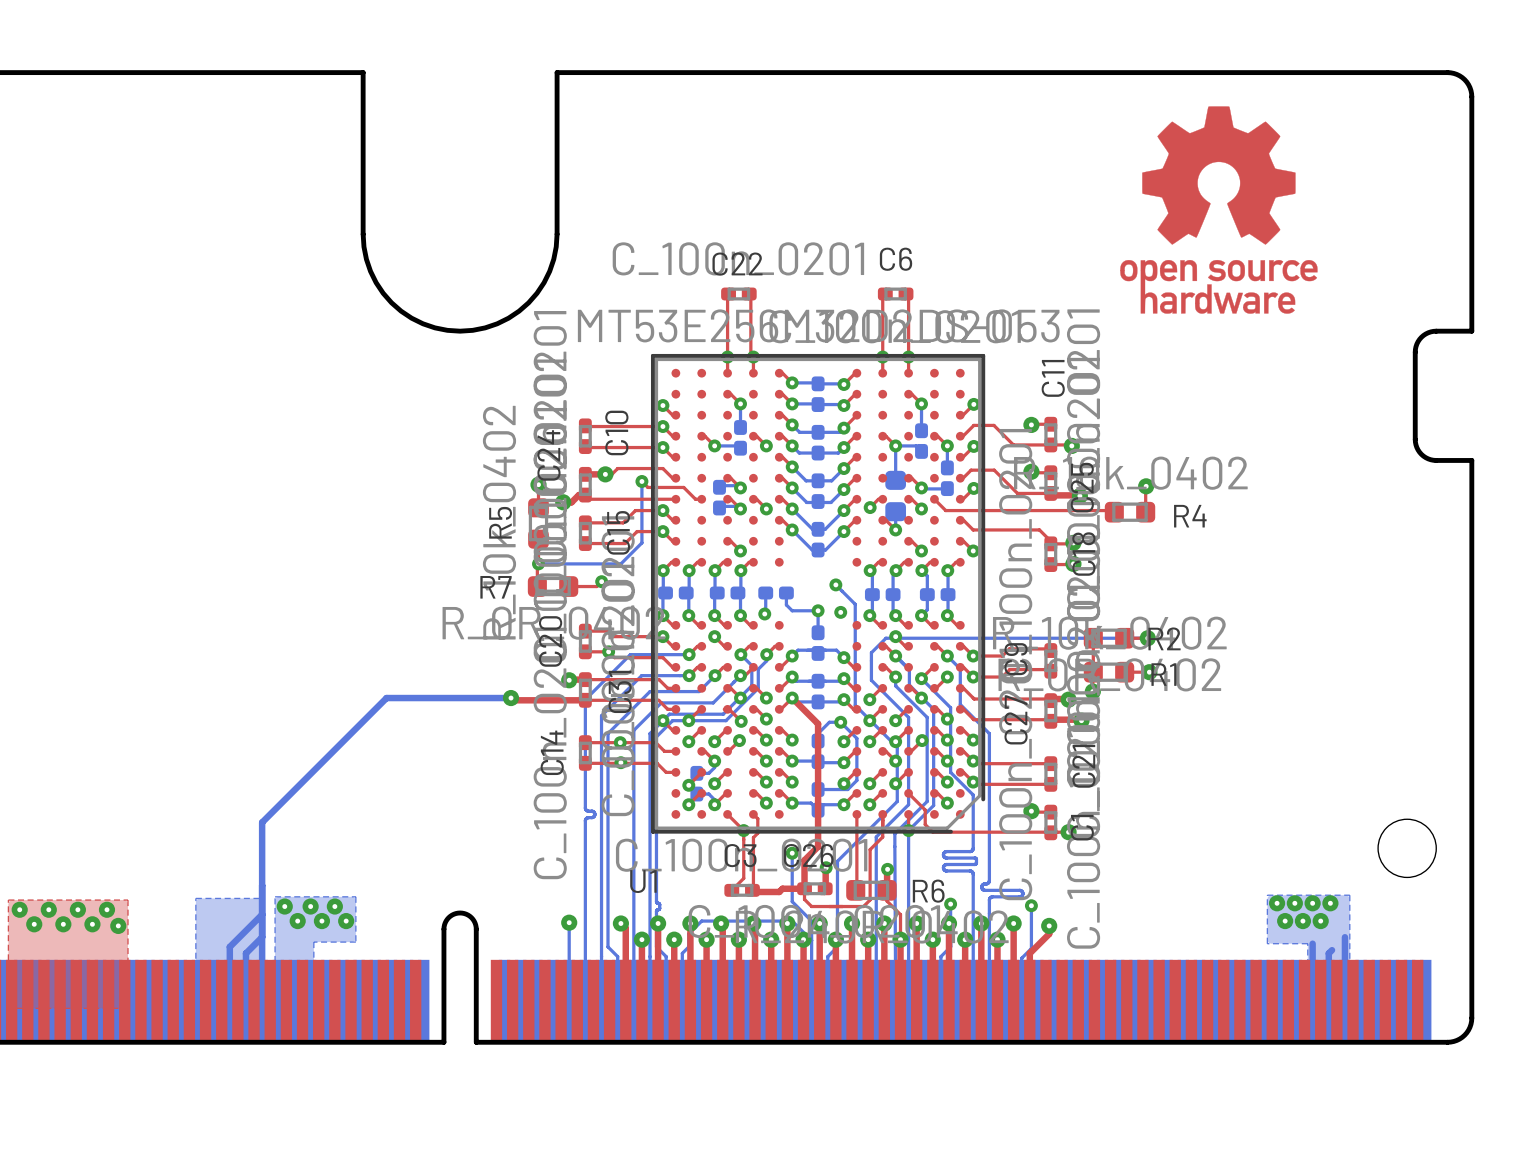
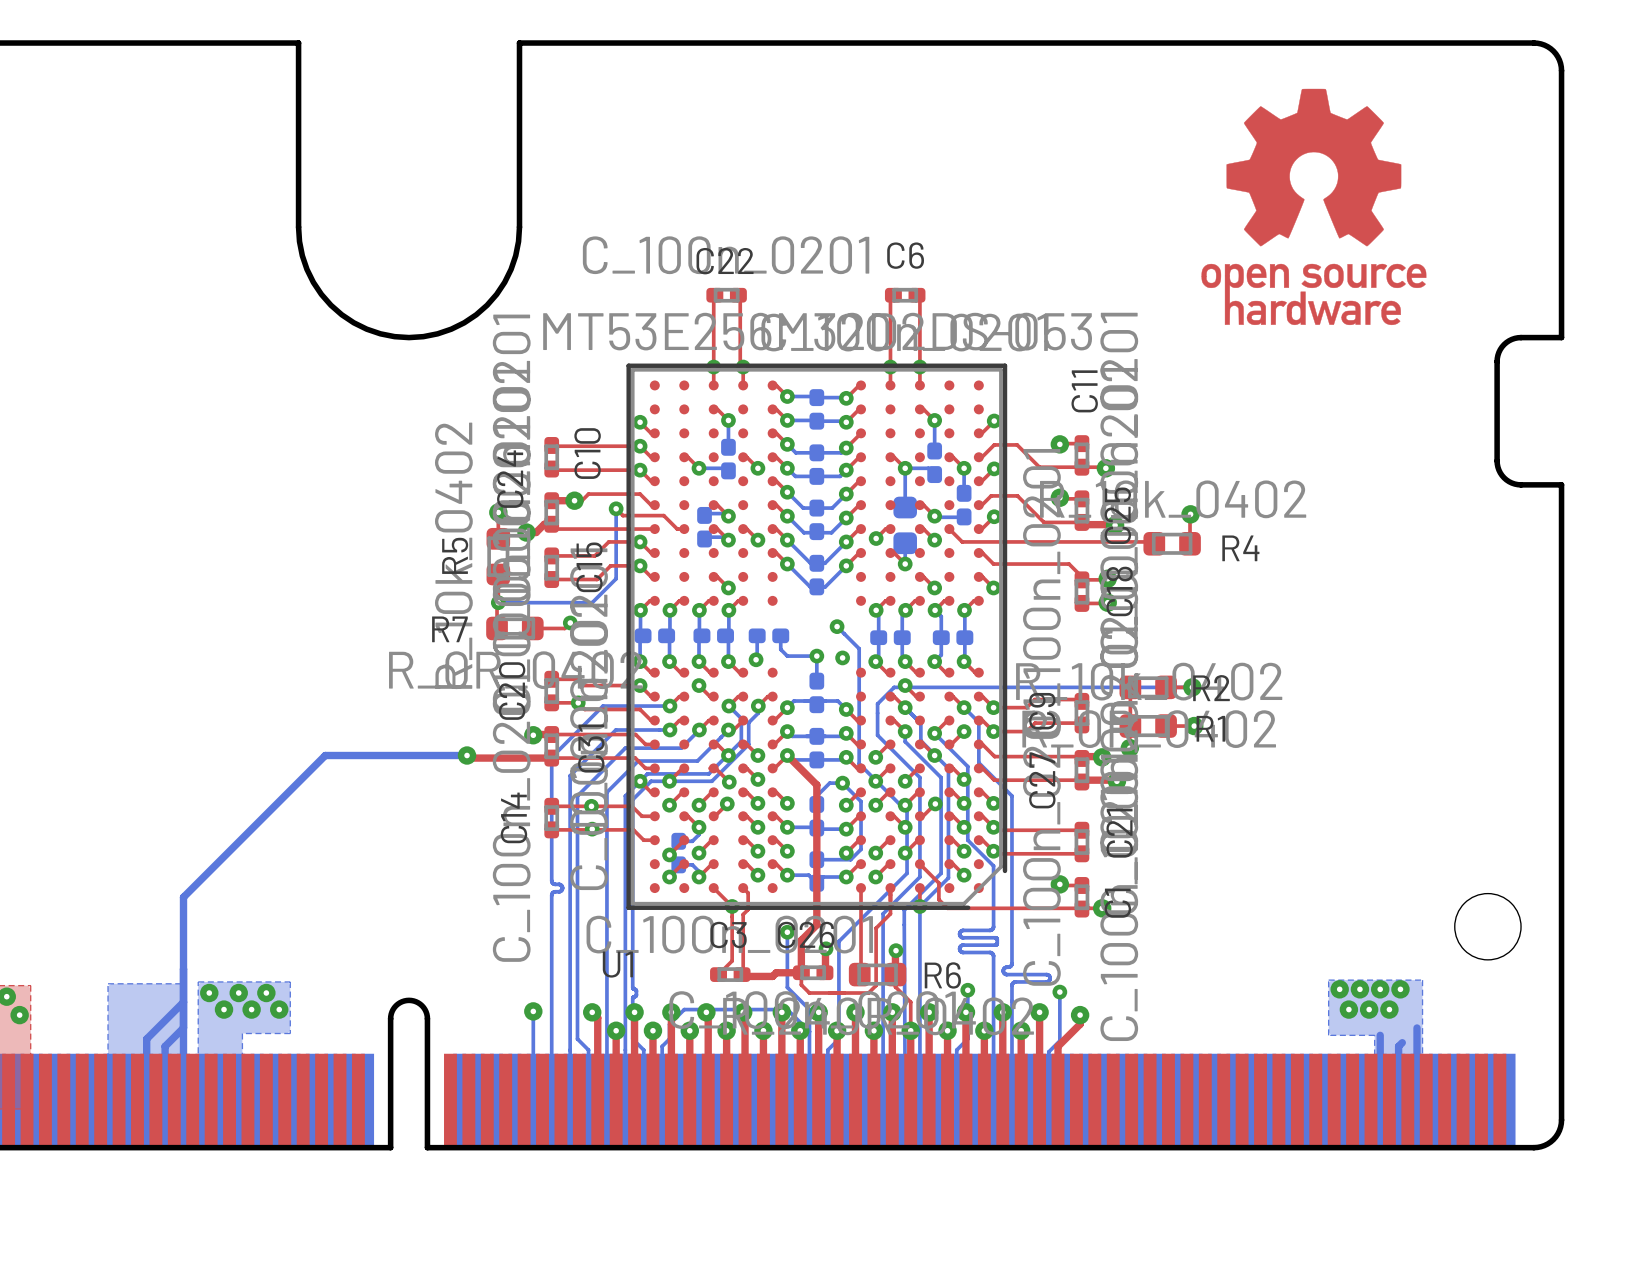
drawing position: (1218, 210) -> (1313, 206)

